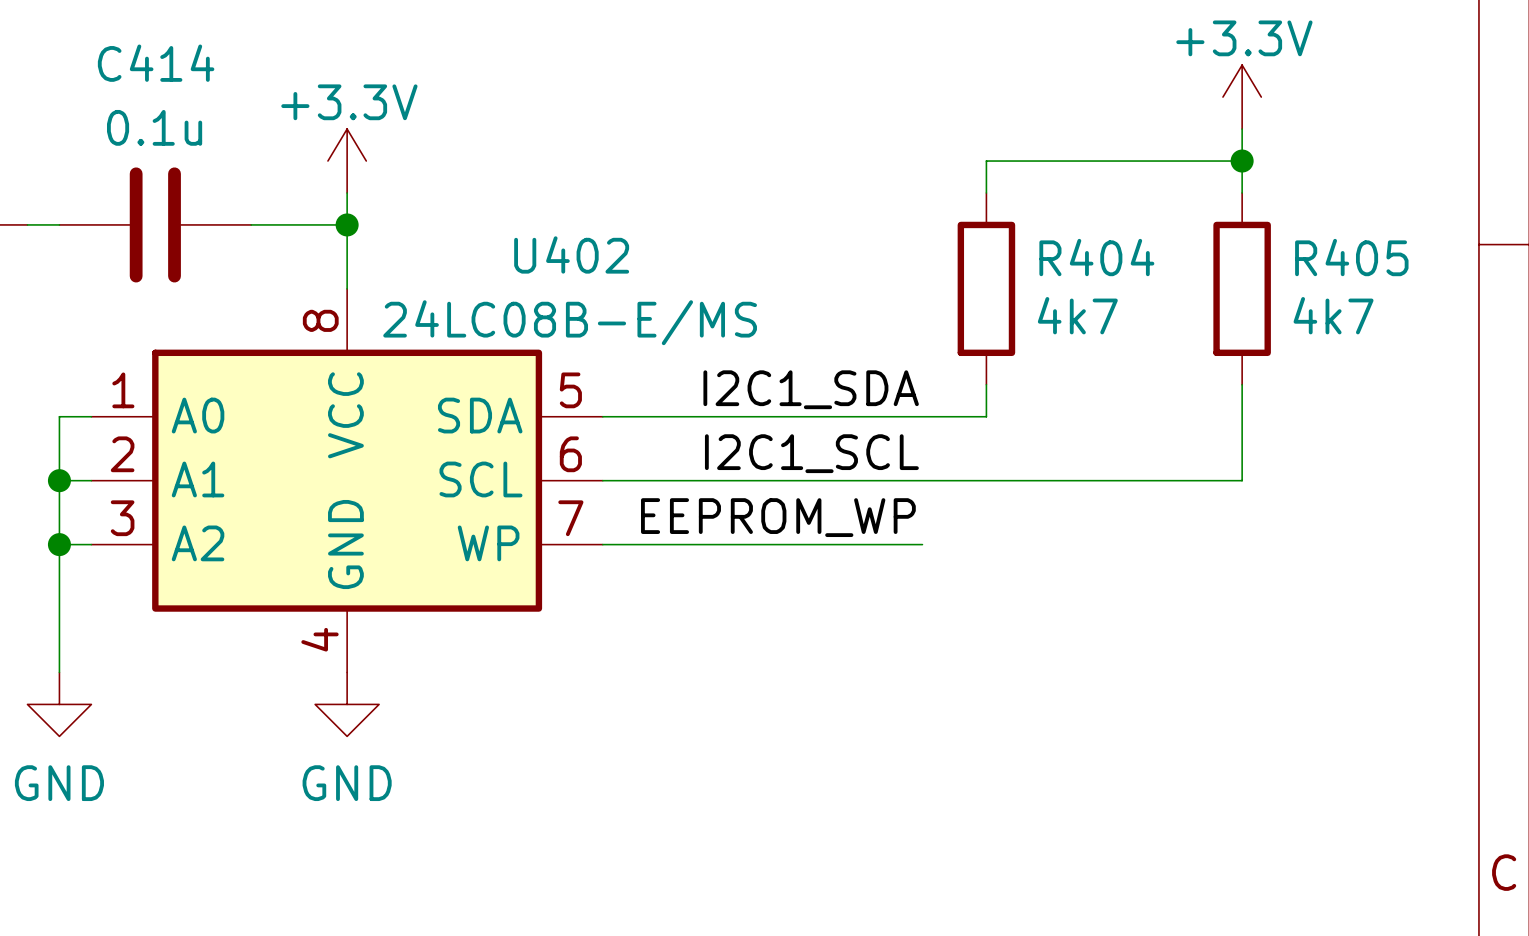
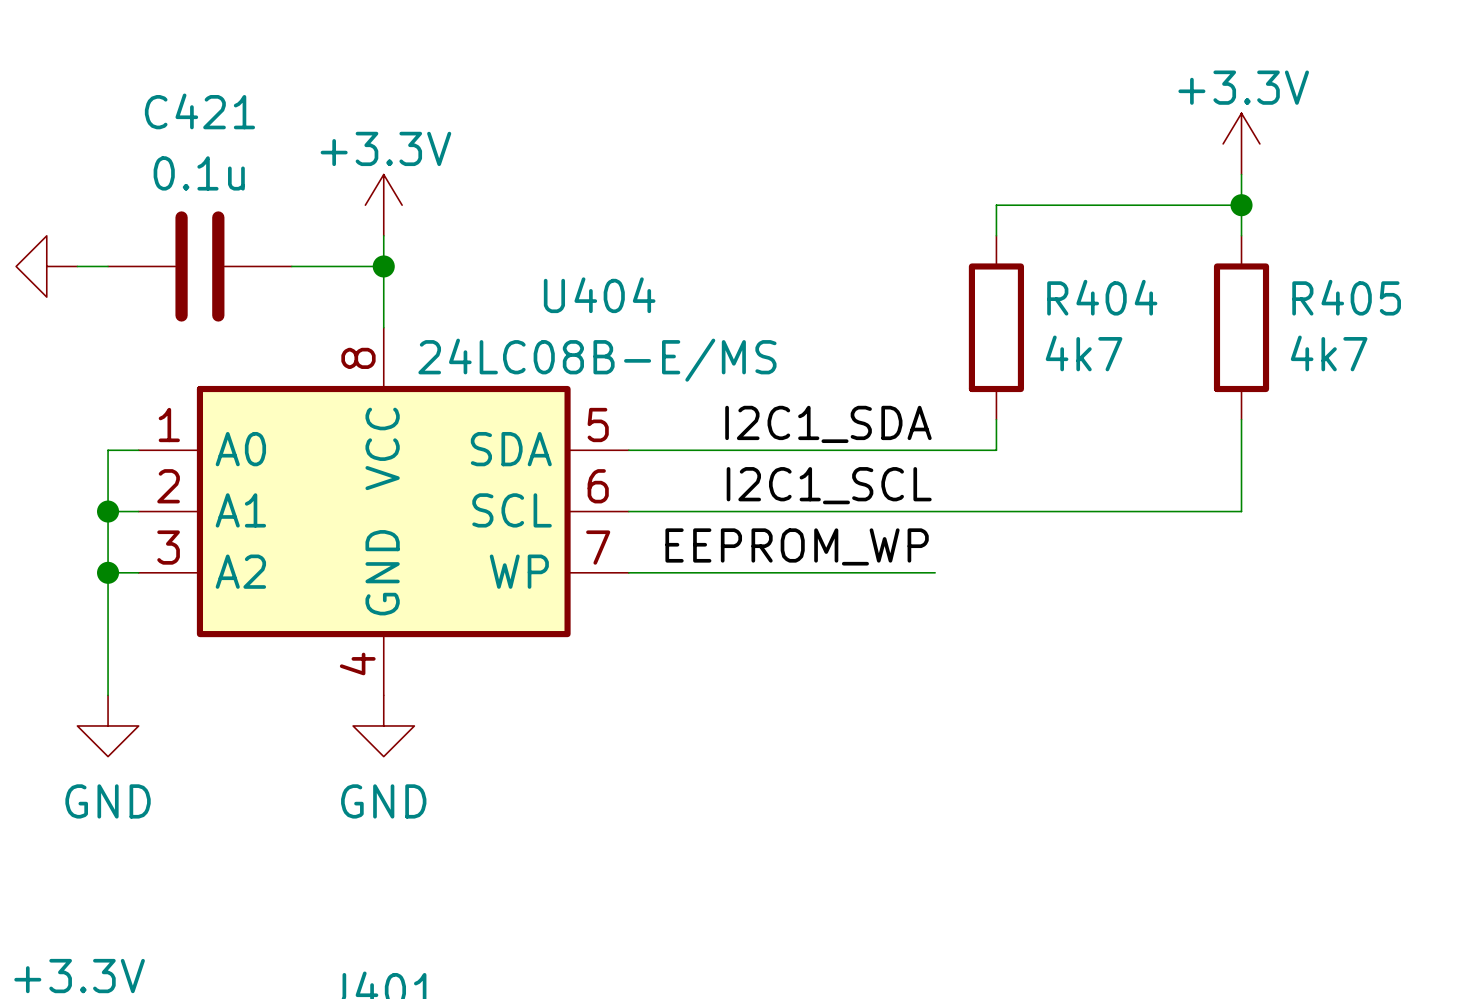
C414 name: C414 (156, 63) -> C421 (199, 111)
U402 name: U402 (571, 254) -> U404 (599, 295)

